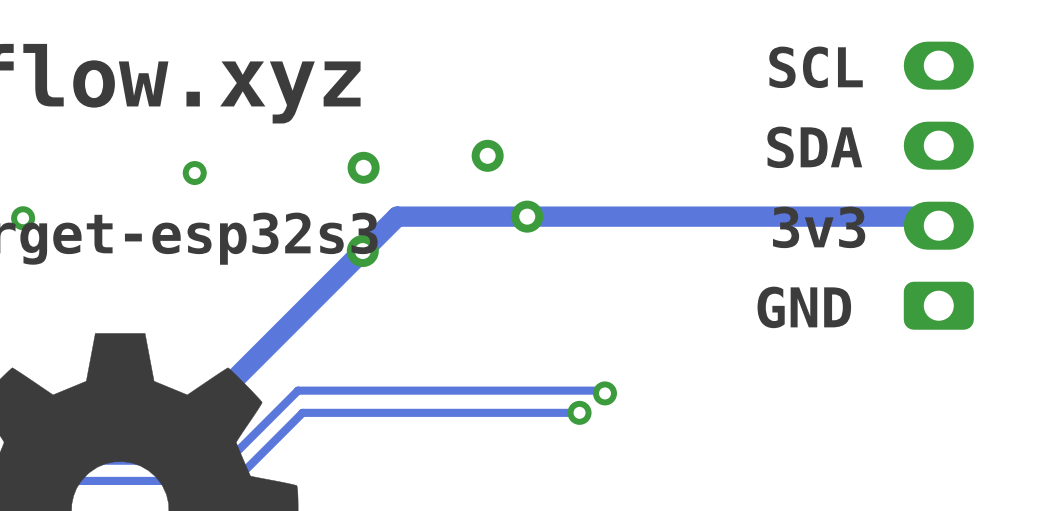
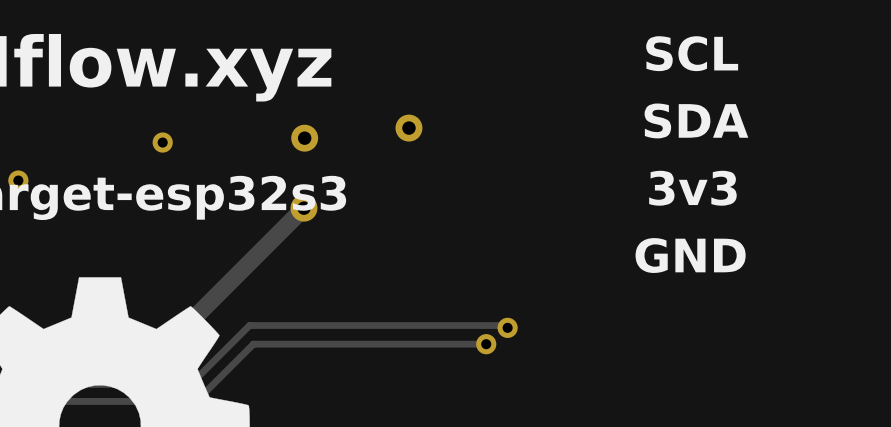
part: (938, 185) -> none
via: (527, 216) -> none
track: (938, 225) (929, 216) (397, 216) (362, 251) -> none

